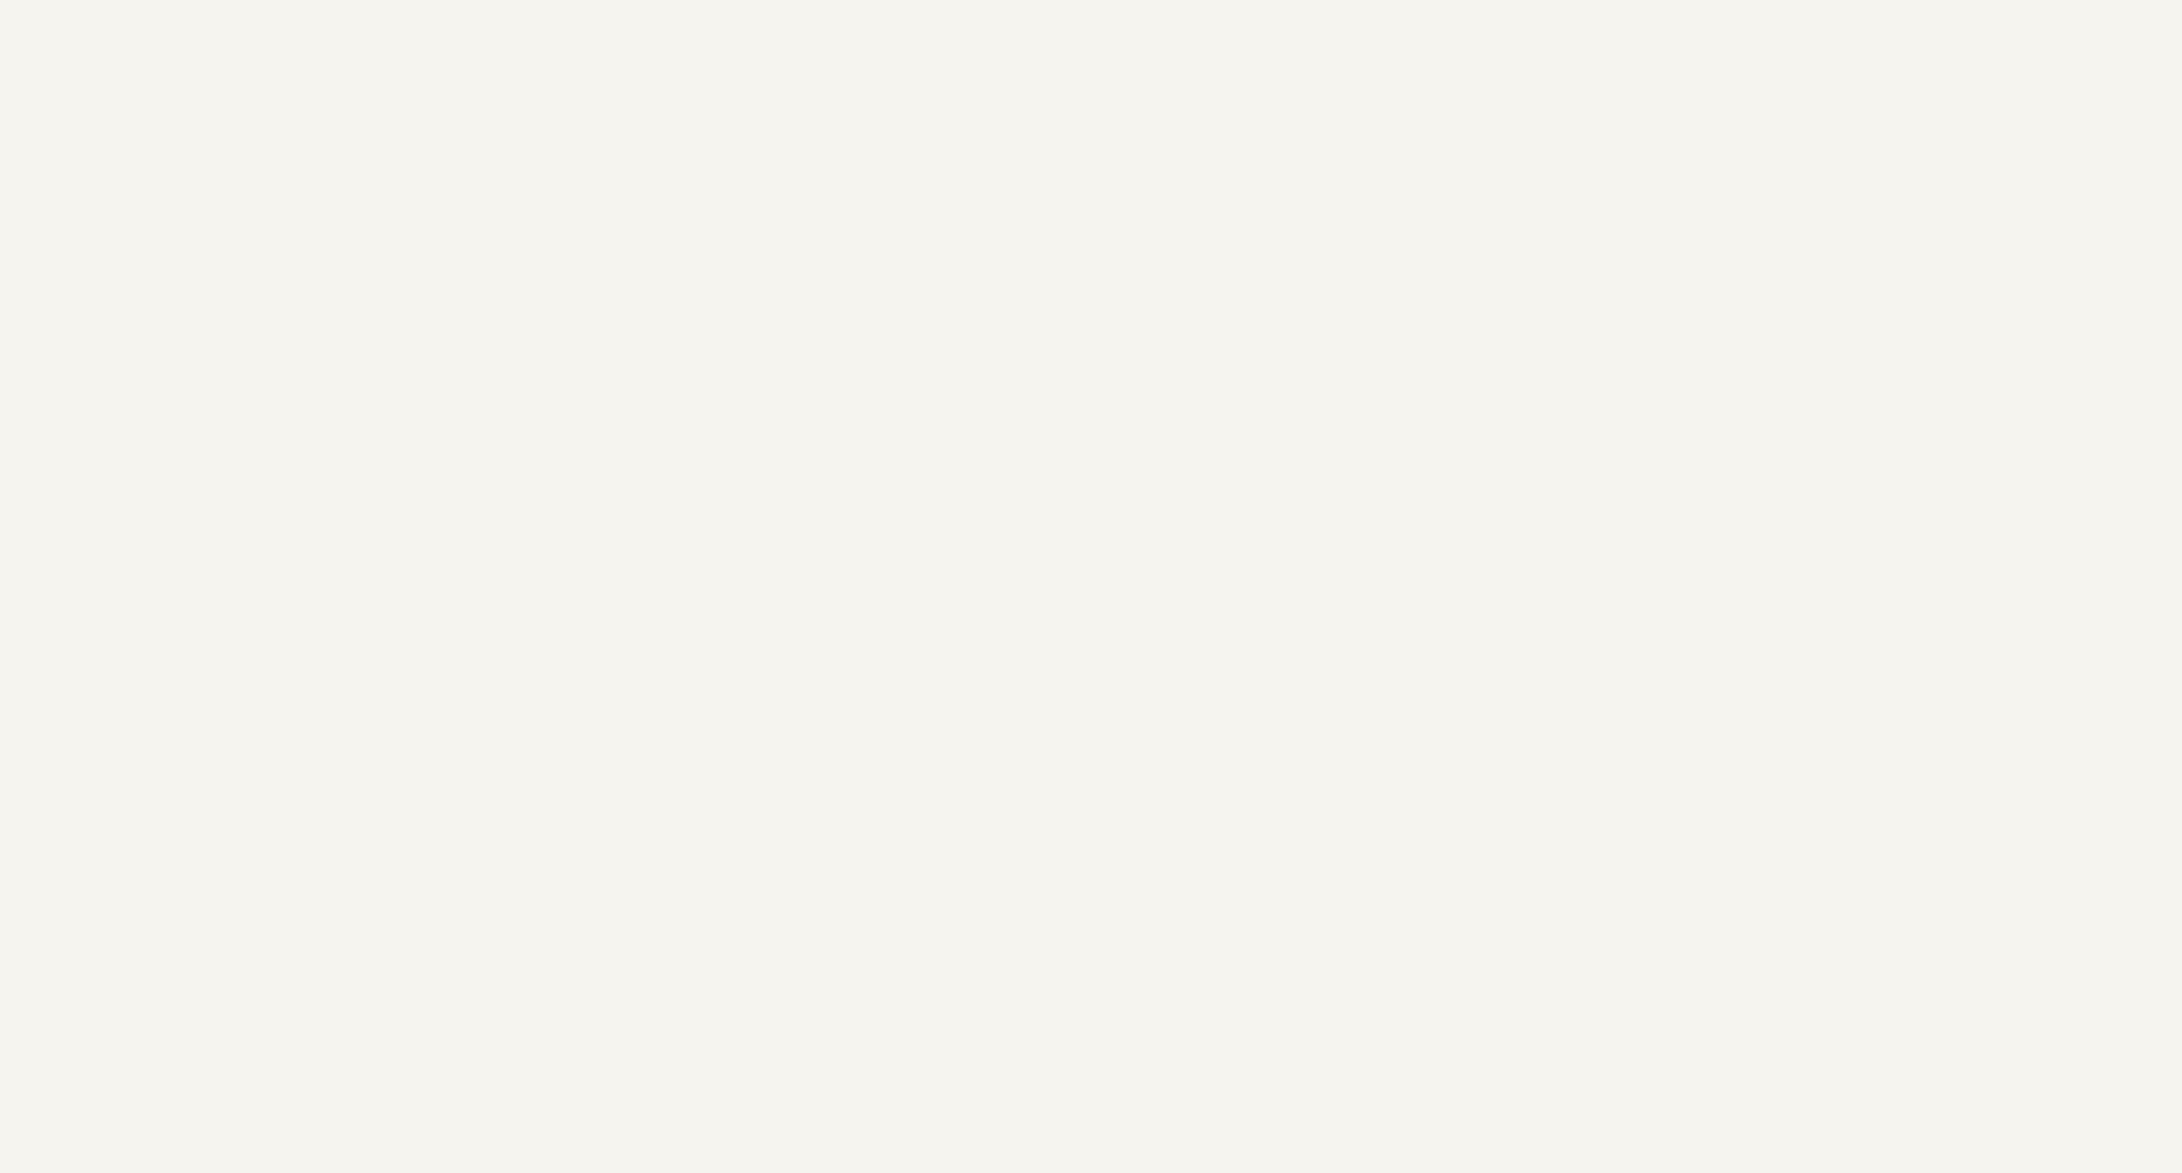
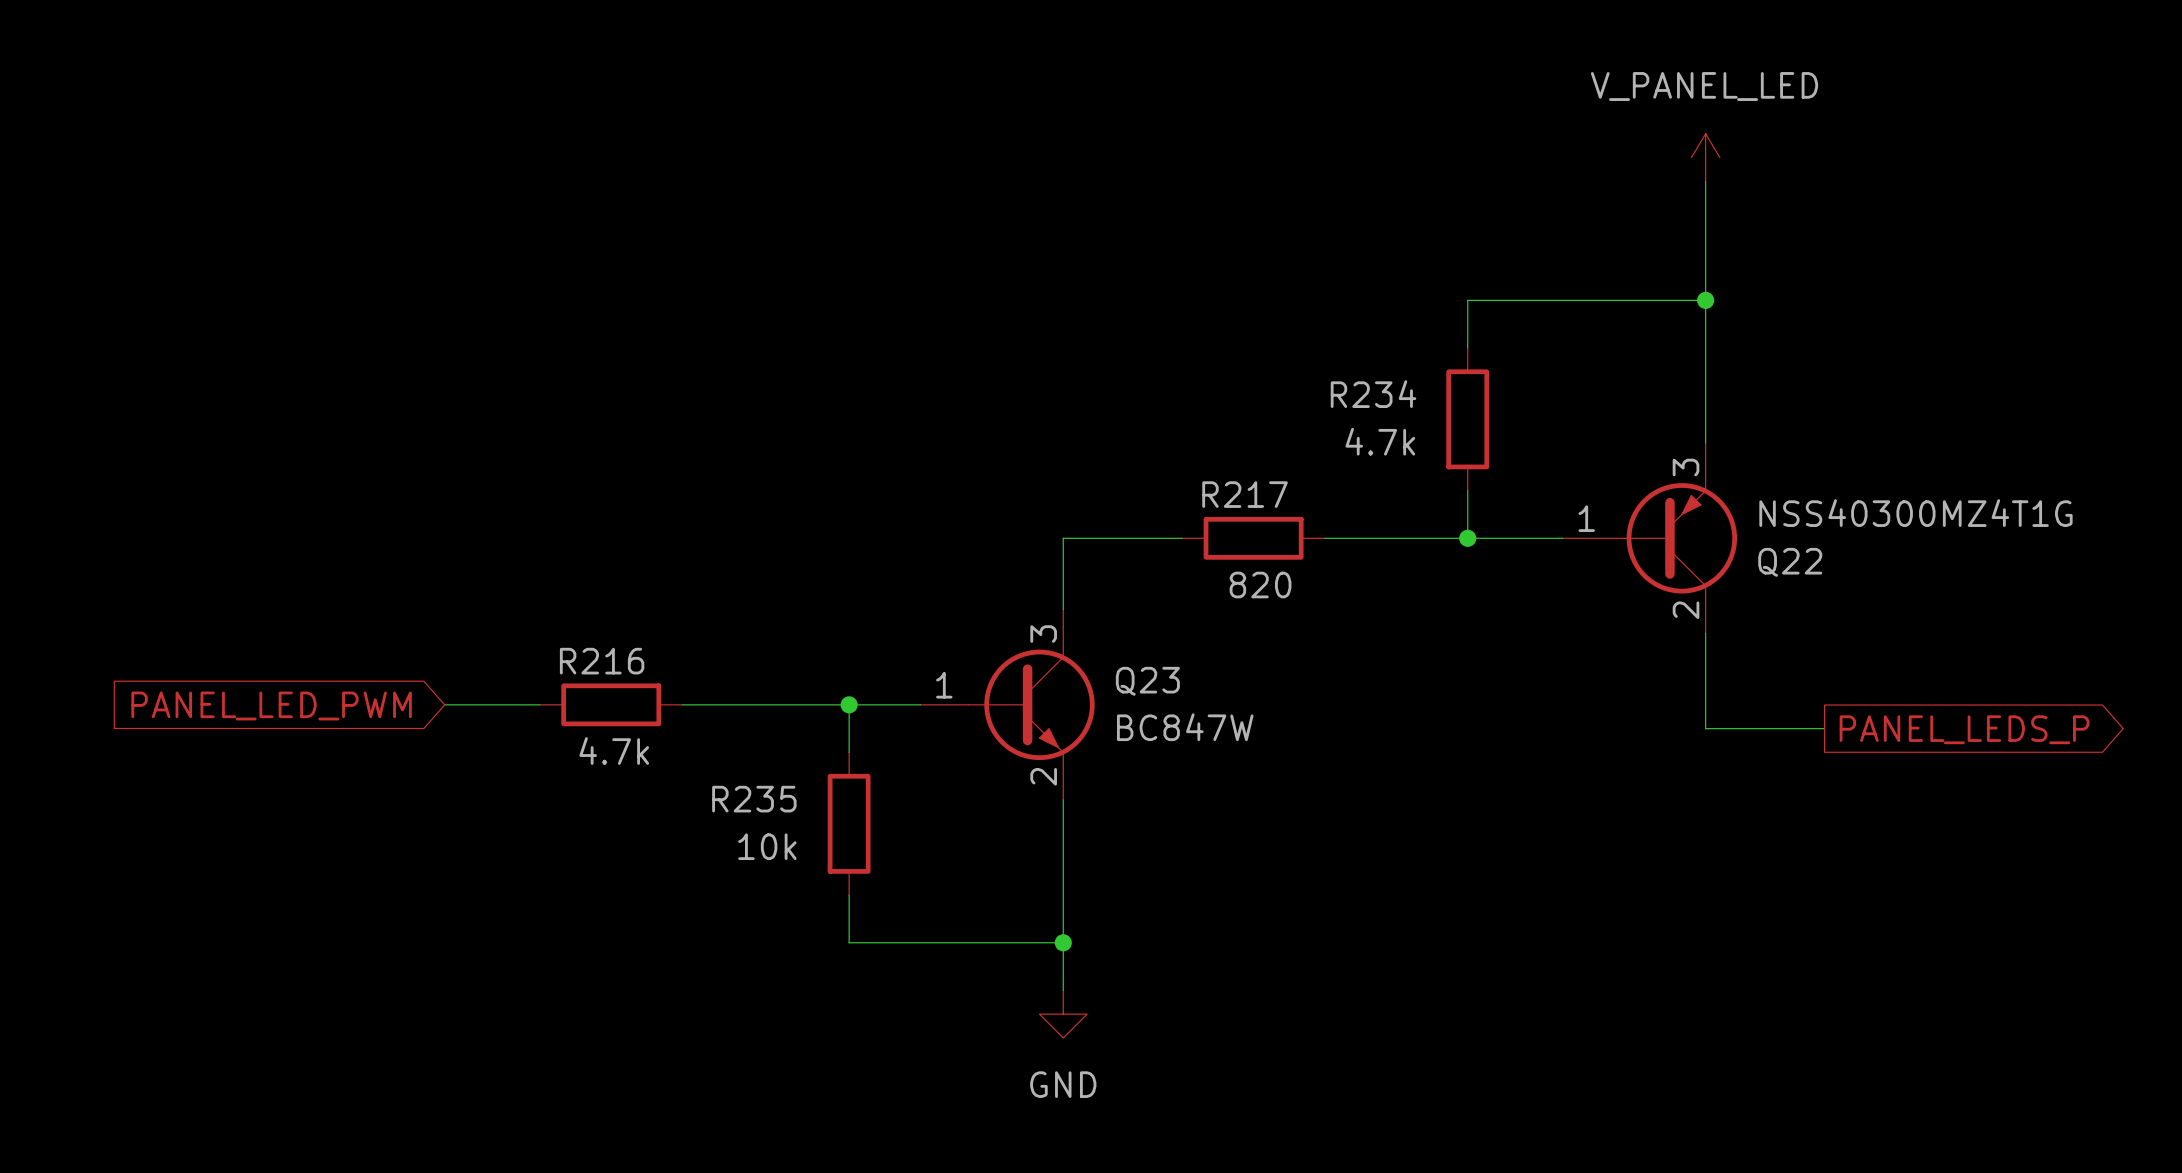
power symbol: none -> V_PANEL_LED (1705, 157)
wire: none -> (1705, 181) (1705, 443)
wire: none -> (1705, 300) (1467, 300) (1467, 347)
junction: none -> (1705, 300)
R234: none -> 4.7k (1467, 419)
wire: none -> (1467, 490) (1467, 538)
wire: none -> (1182, 538) (1063, 538) (1063, 609)
R217: none -> 820 (1253, 538)
wire: none -> (1324, 538) (1562, 538)
junction: none -> (1467, 538)
Q22: none -> NSS40300MZ4T1G (1649, 538)
wire: none -> (1705, 633) (1705, 728) (1824, 728)
wire: none -> (444, 704) (539, 704)
R216: none -> 4.7k (611, 704)
wire: none -> (682, 704) (920, 704)
wire: none -> (849, 704) (849, 752)
junction: none -> (849, 704)
Q23: none -> BC847W (1007, 704)
global label: none -> PANEL_LED_PWM (271, 705)
global label: none -> PANEL_LEDS_P (1964, 729)
wire: none -> (1063, 800) (1063, 990)
R235: none -> 10k (849, 823)
wire: none -> (849, 895) (849, 942) (1063, 942)
junction: none -> (1063, 942)
power symbol: none -> GND (1063, 1014)

